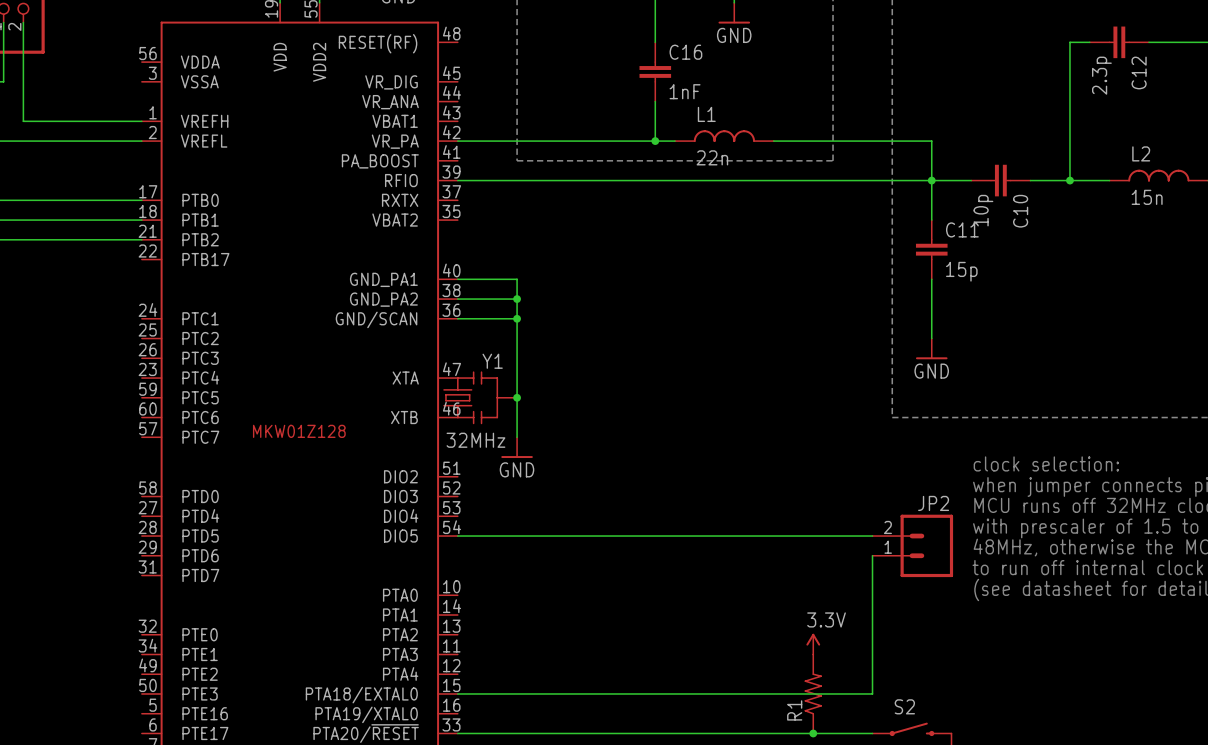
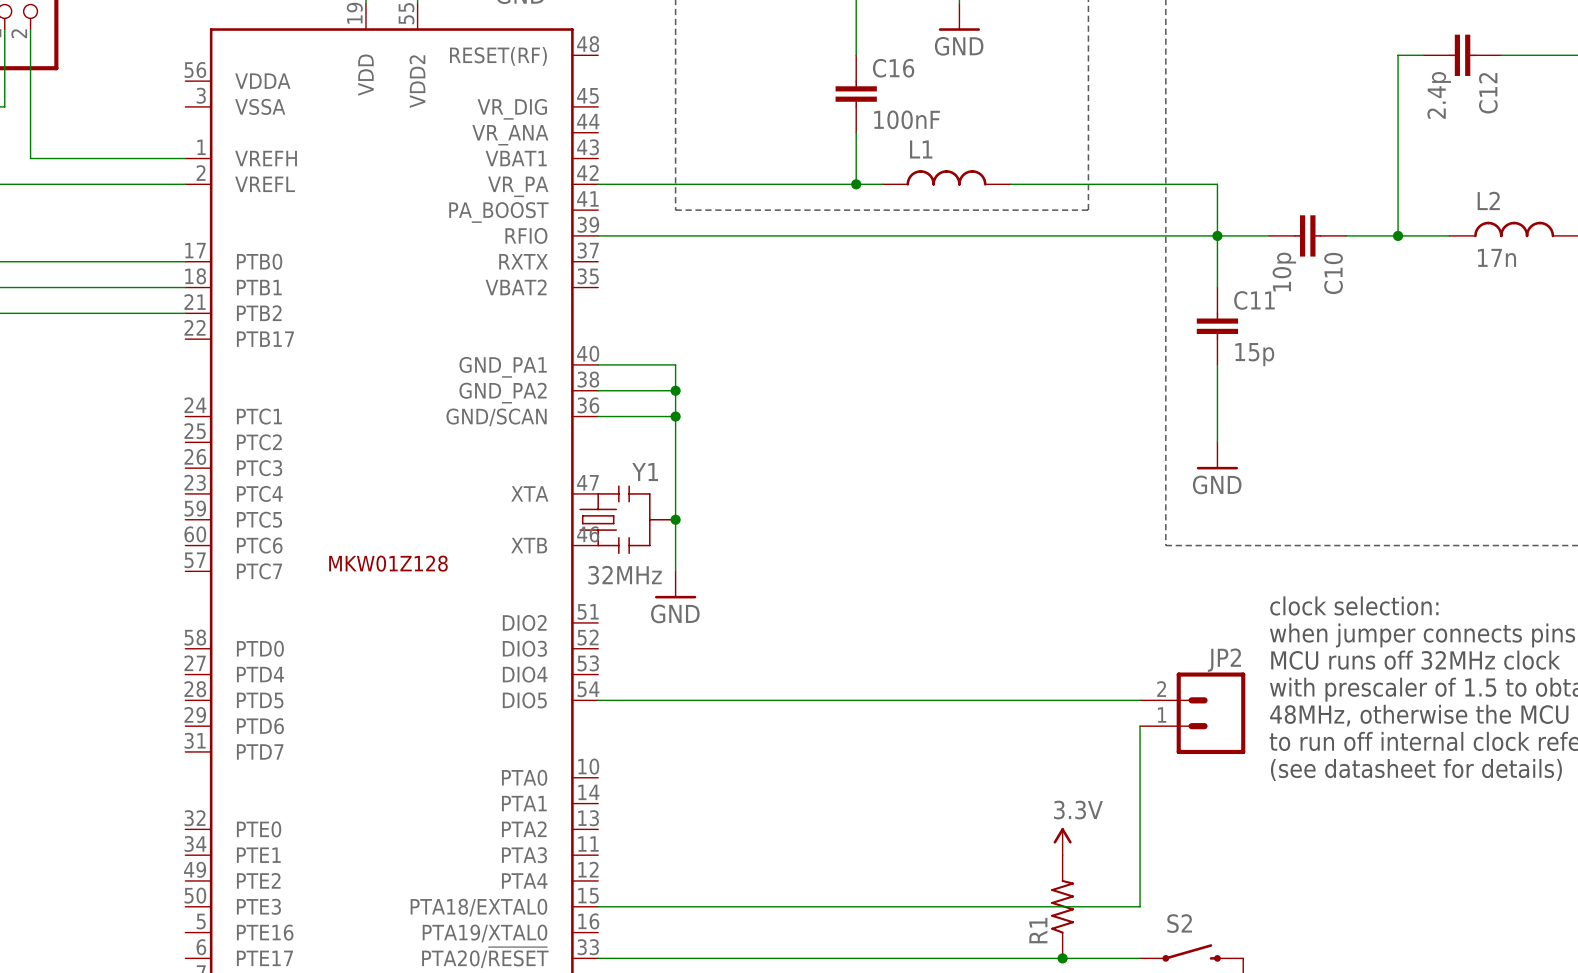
C12 value: 2.3p (1101, 75) -> 2.4p (1439, 95)
C16 value: 1nF (685, 91) -> 100nF (907, 119)
L1 value: 22n (712, 157) -> none
L2 value: 15n (1147, 197) -> 17n (1496, 257)

